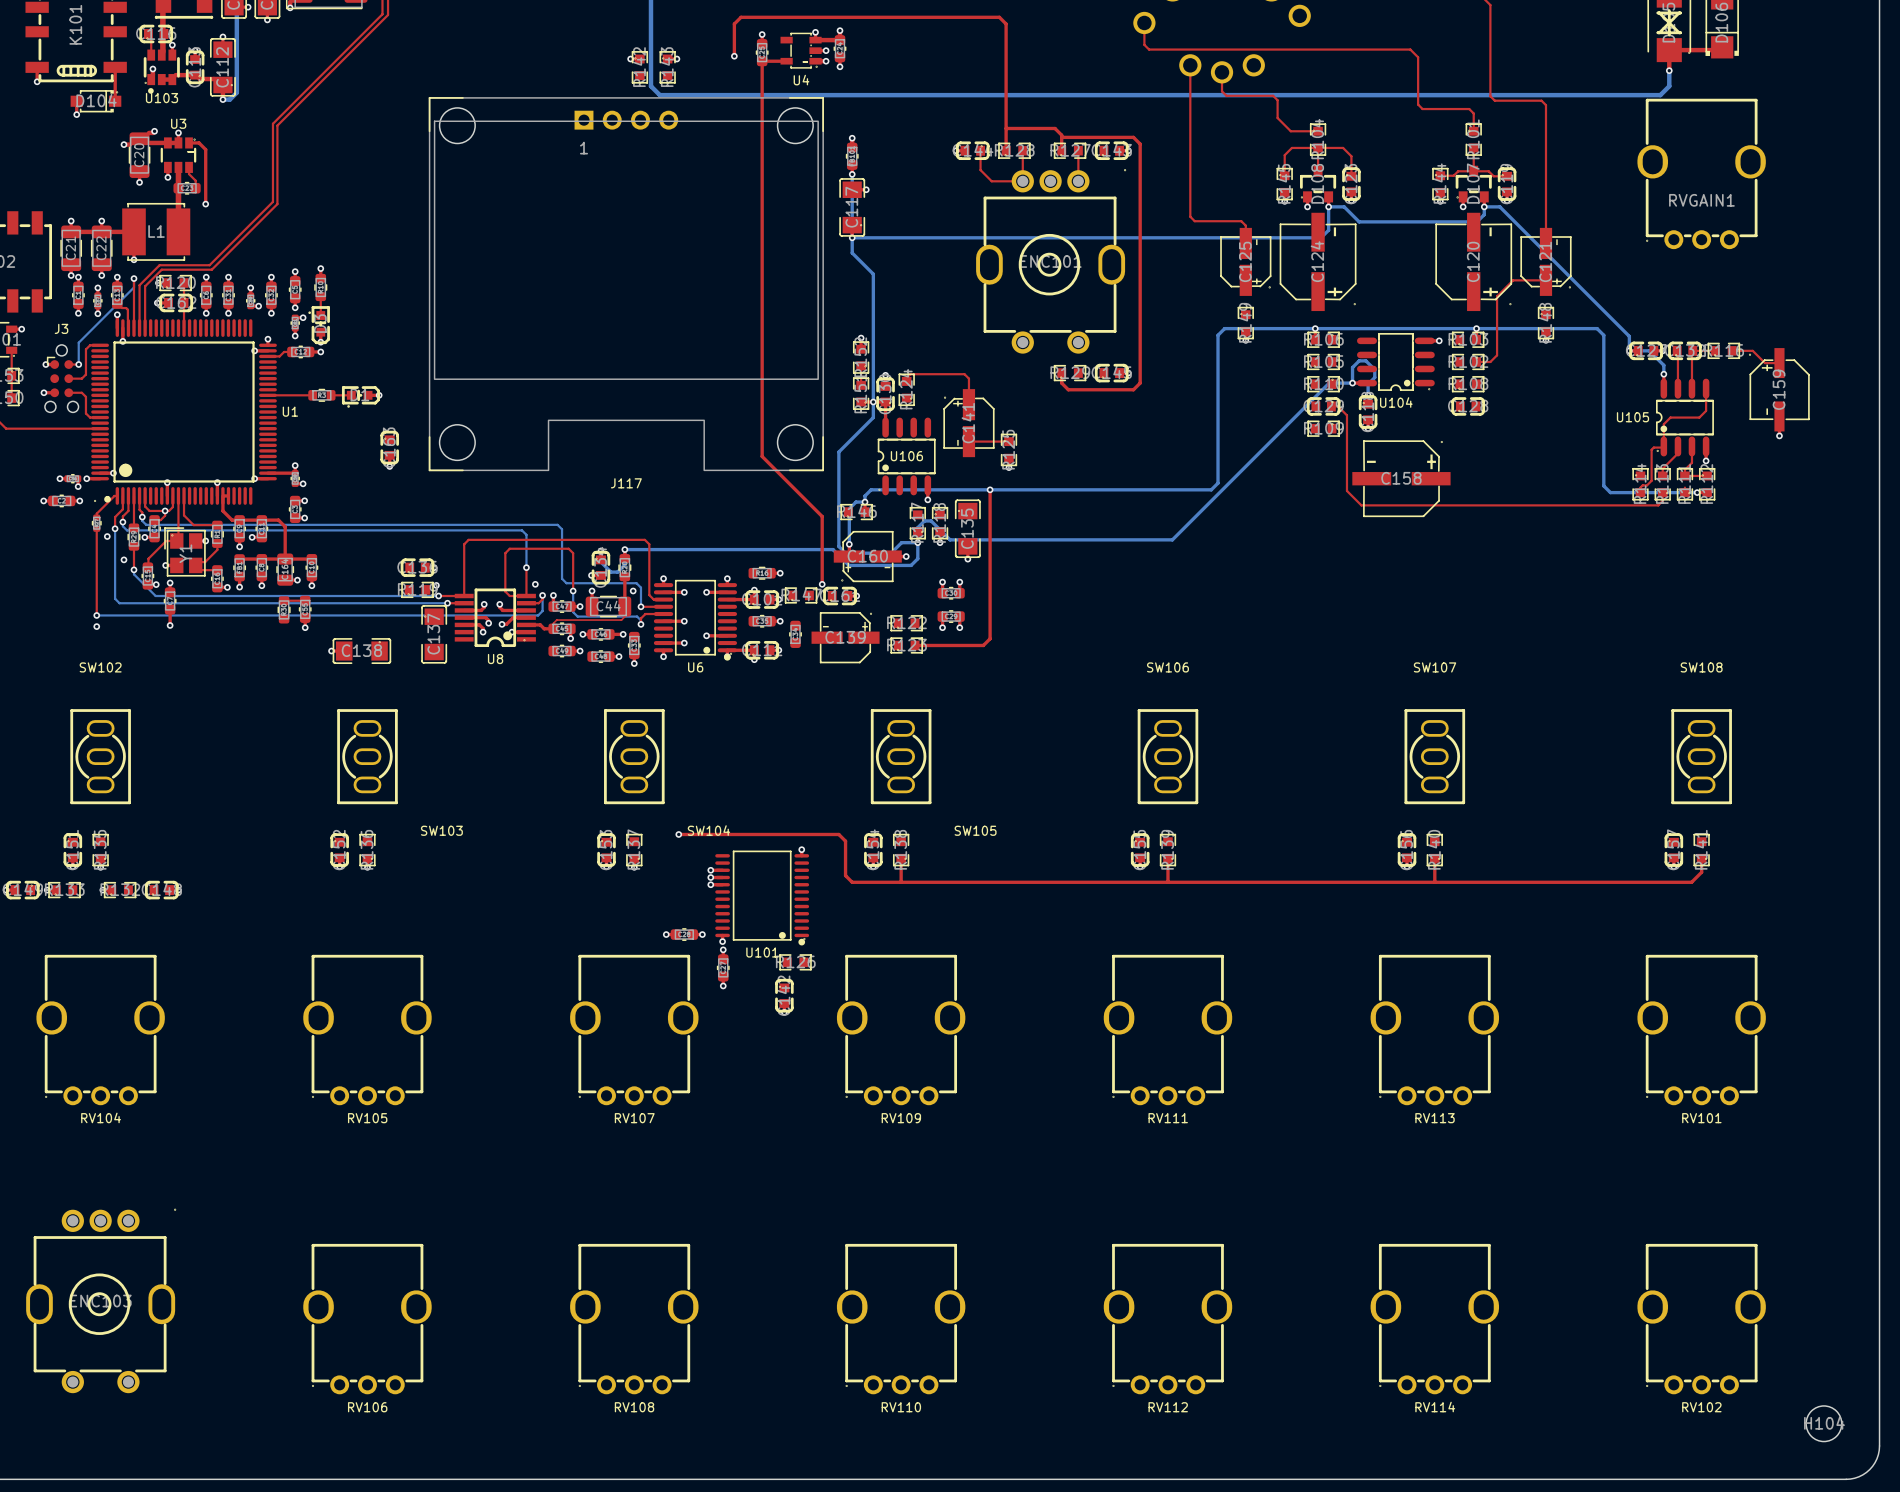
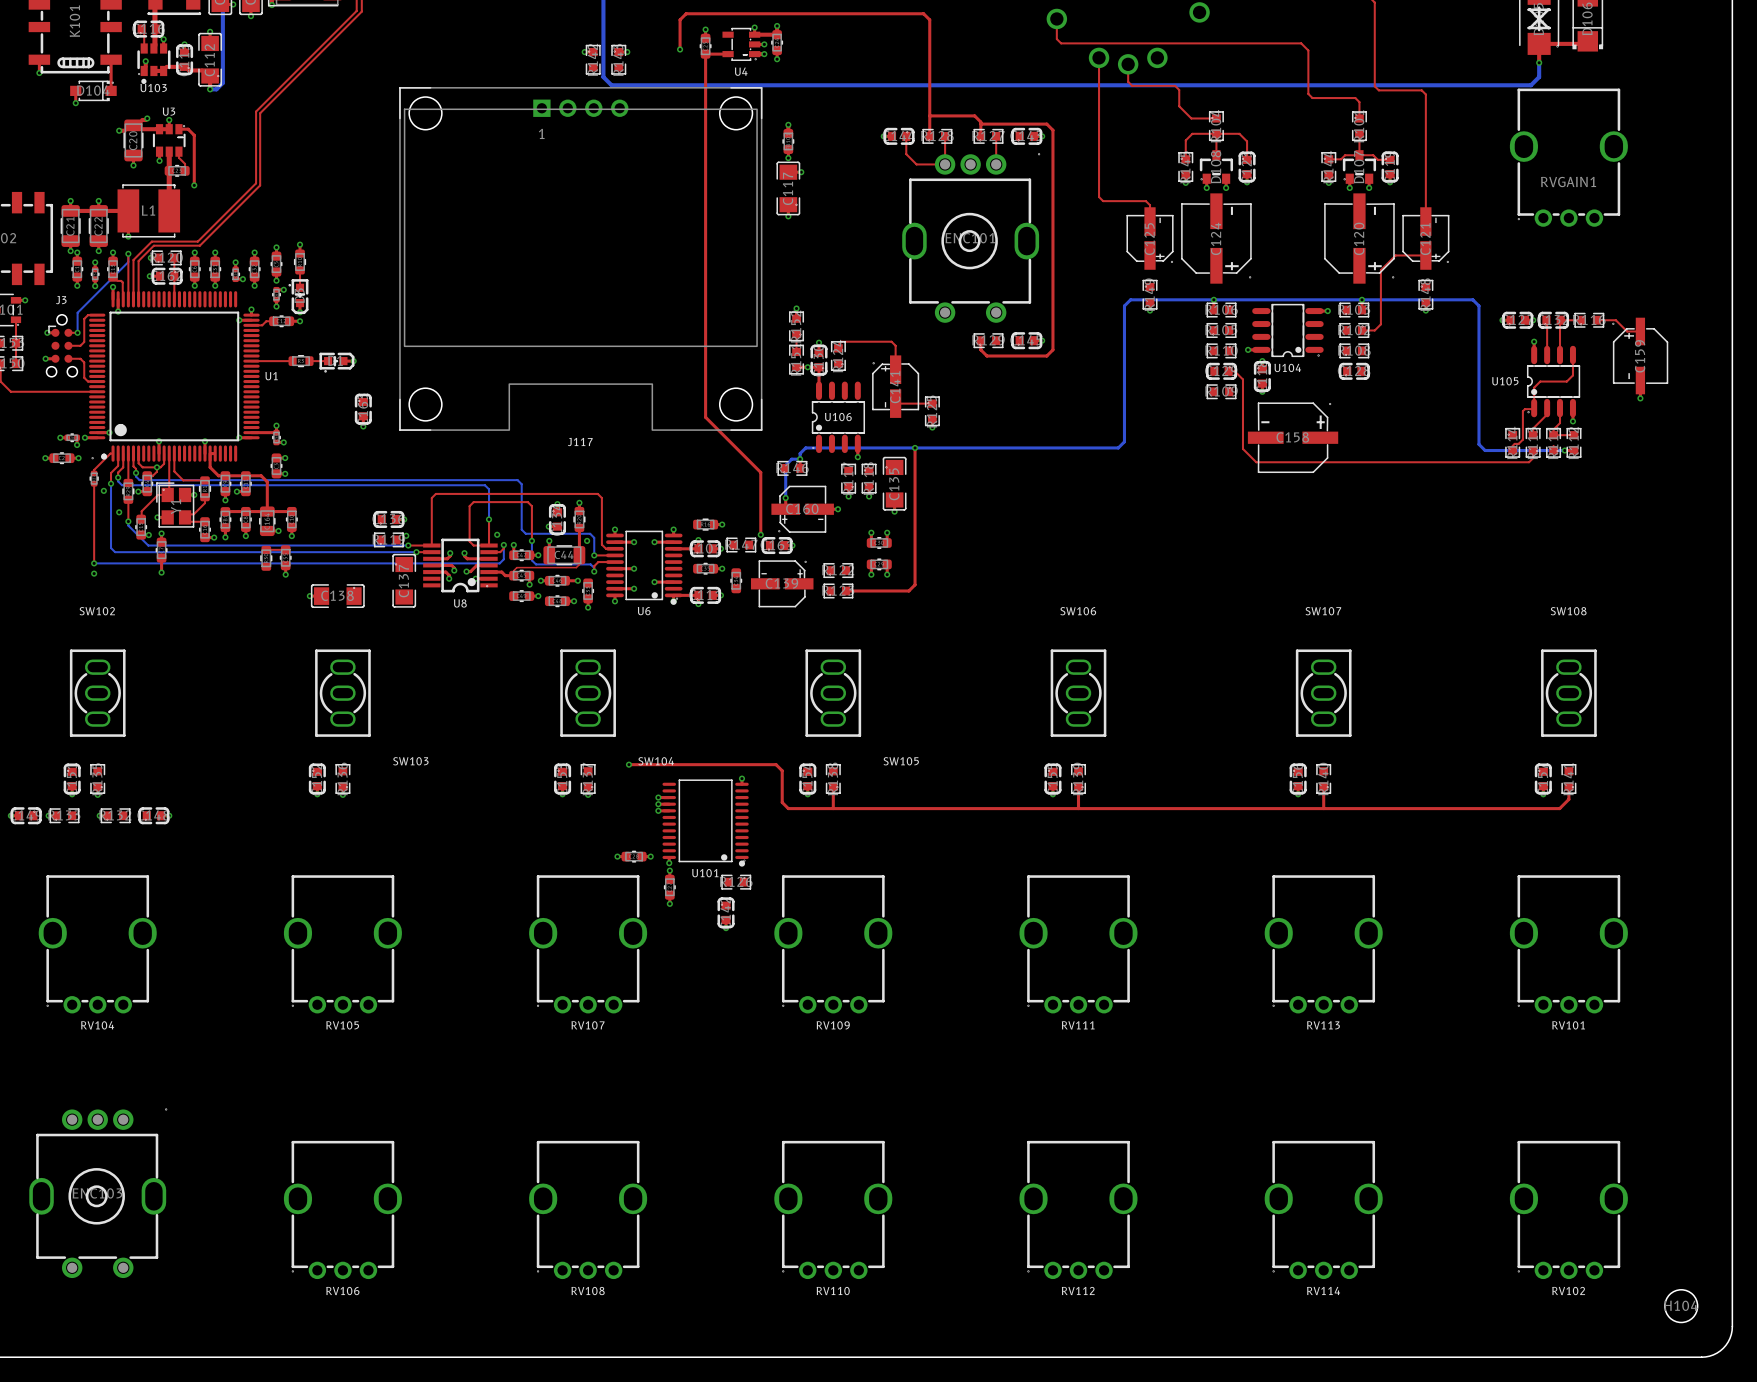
bottom track: (852, 174) (852, 253) (873, 274) (873, 417) (838, 452) (838, 546) (845, 553) (891, 553) (901, 542) (917, 542) -> none
bottom track: (852, 237) (1321, 237) (1328, 230) (1328, 206) (1344, 206) (1359, 221) (1477, 221) (1484, 214) (1484, 206) (1499, 206) (1629, 336) (1629, 350) (1649, 350) (1663, 365) (1663, 374) -> none
bottom track: (1368, 395) (1368, 384) (1374, 377) (1374, 369) (1365, 360) (1359, 360) (1352, 367) (1352, 383) (1329, 383) (1172, 539) (950, 539) (931, 520) (924, 520) (917, 527) (917, 558) (911, 565) (848, 565) (833, 549) (624, 549) (624, 564) (617, 572) (610, 572) (600, 562) (600, 550) -> none

